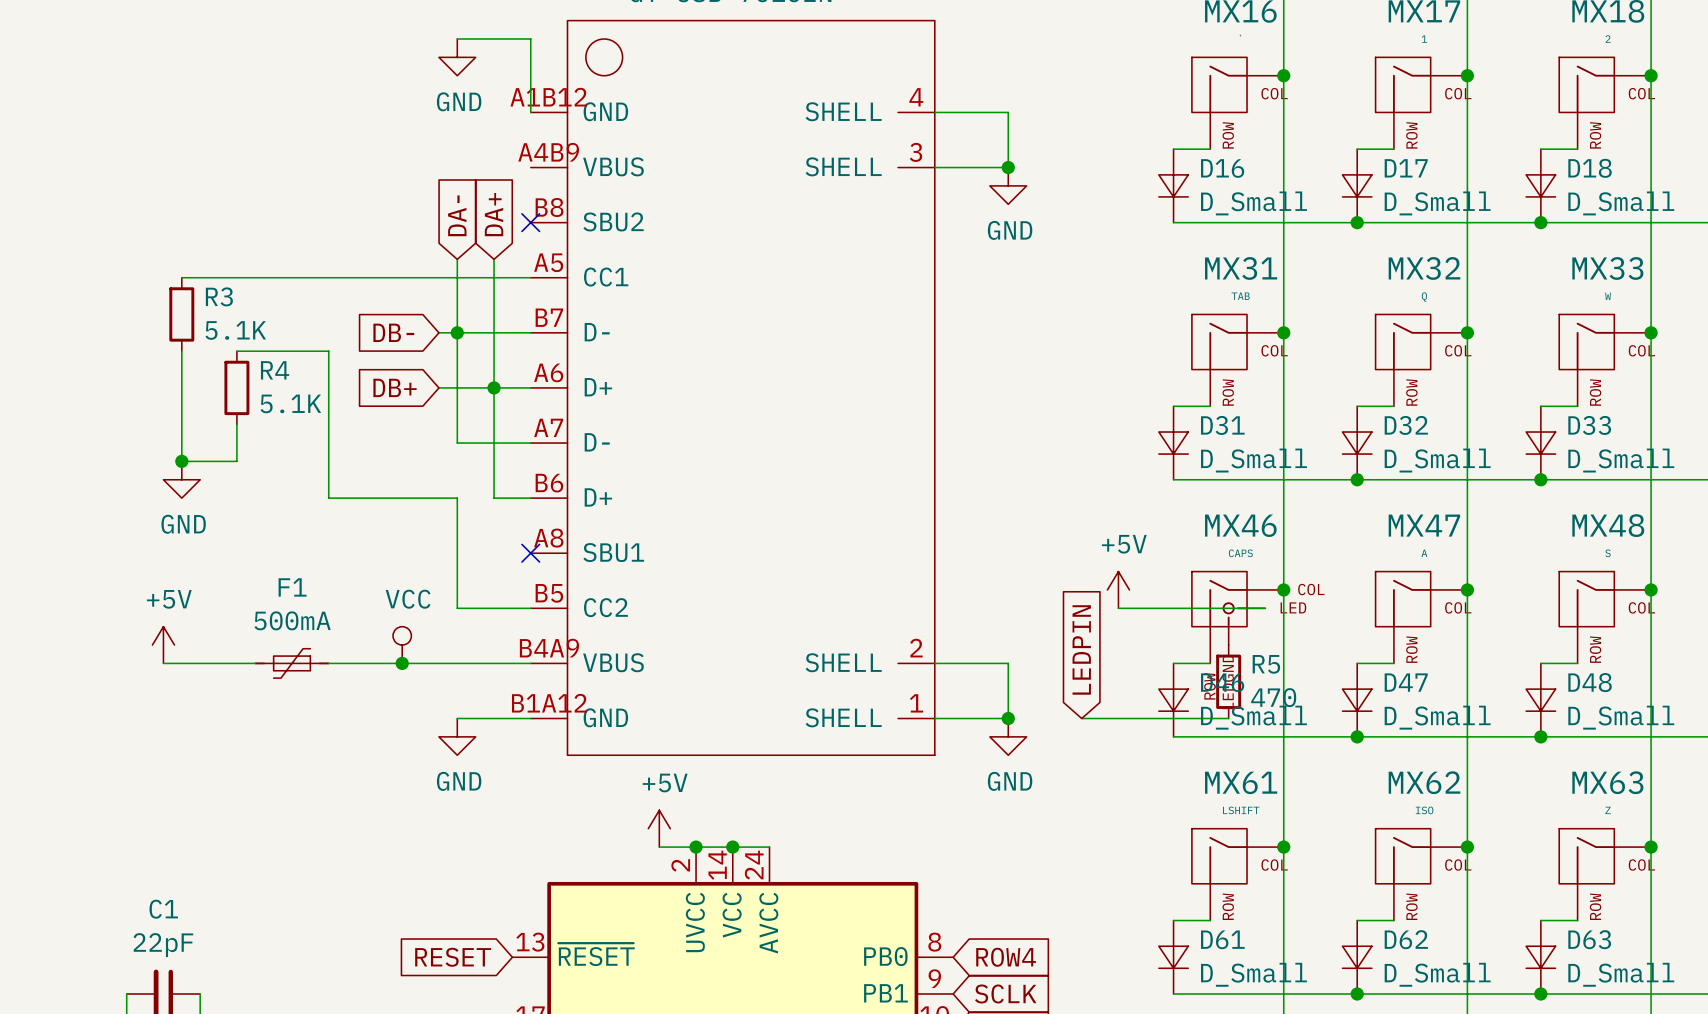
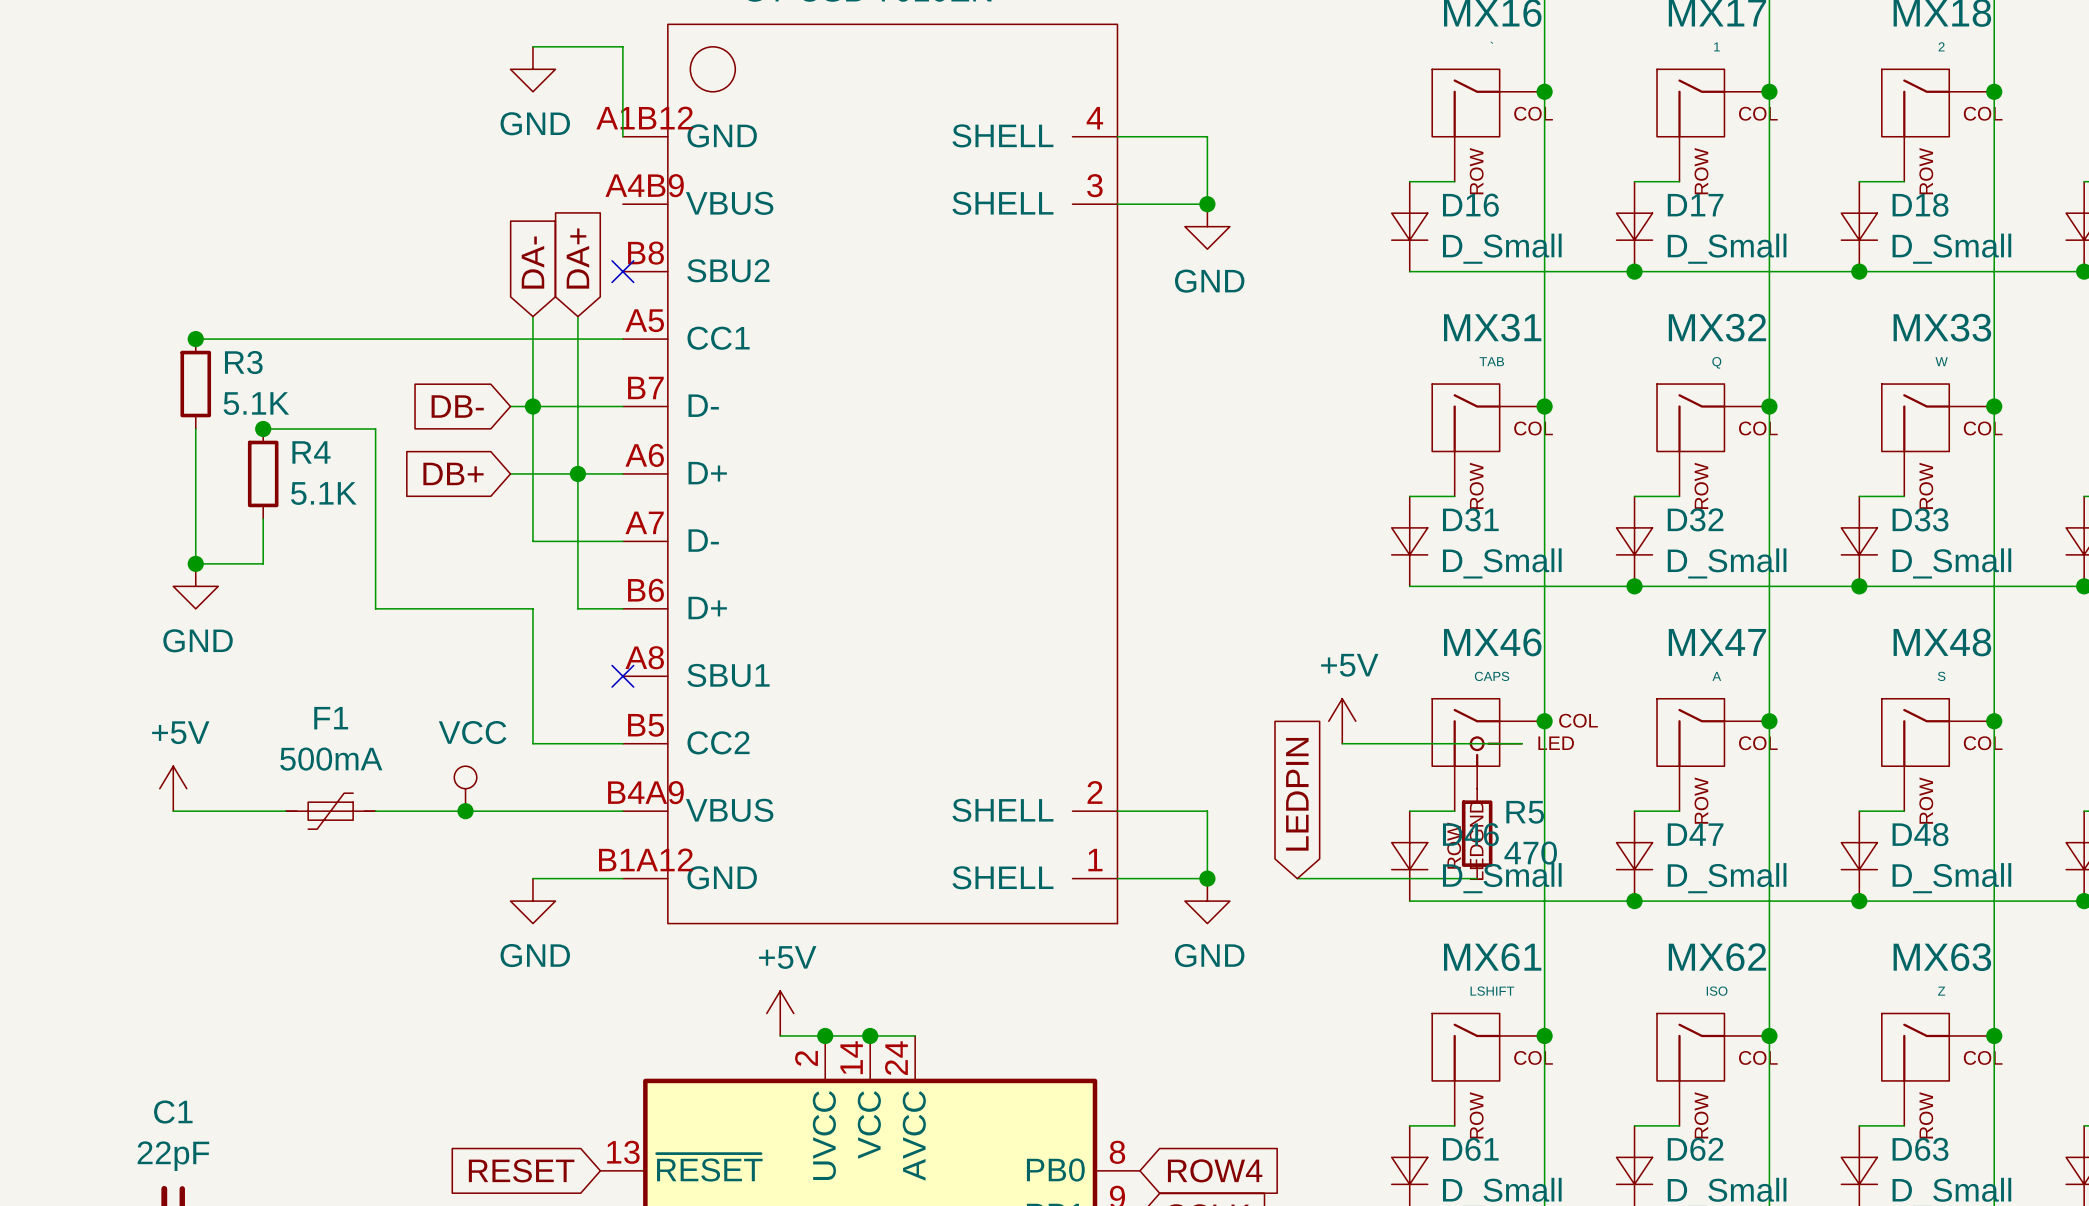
junction: none -> (195, 339)
junction: none -> (263, 428)

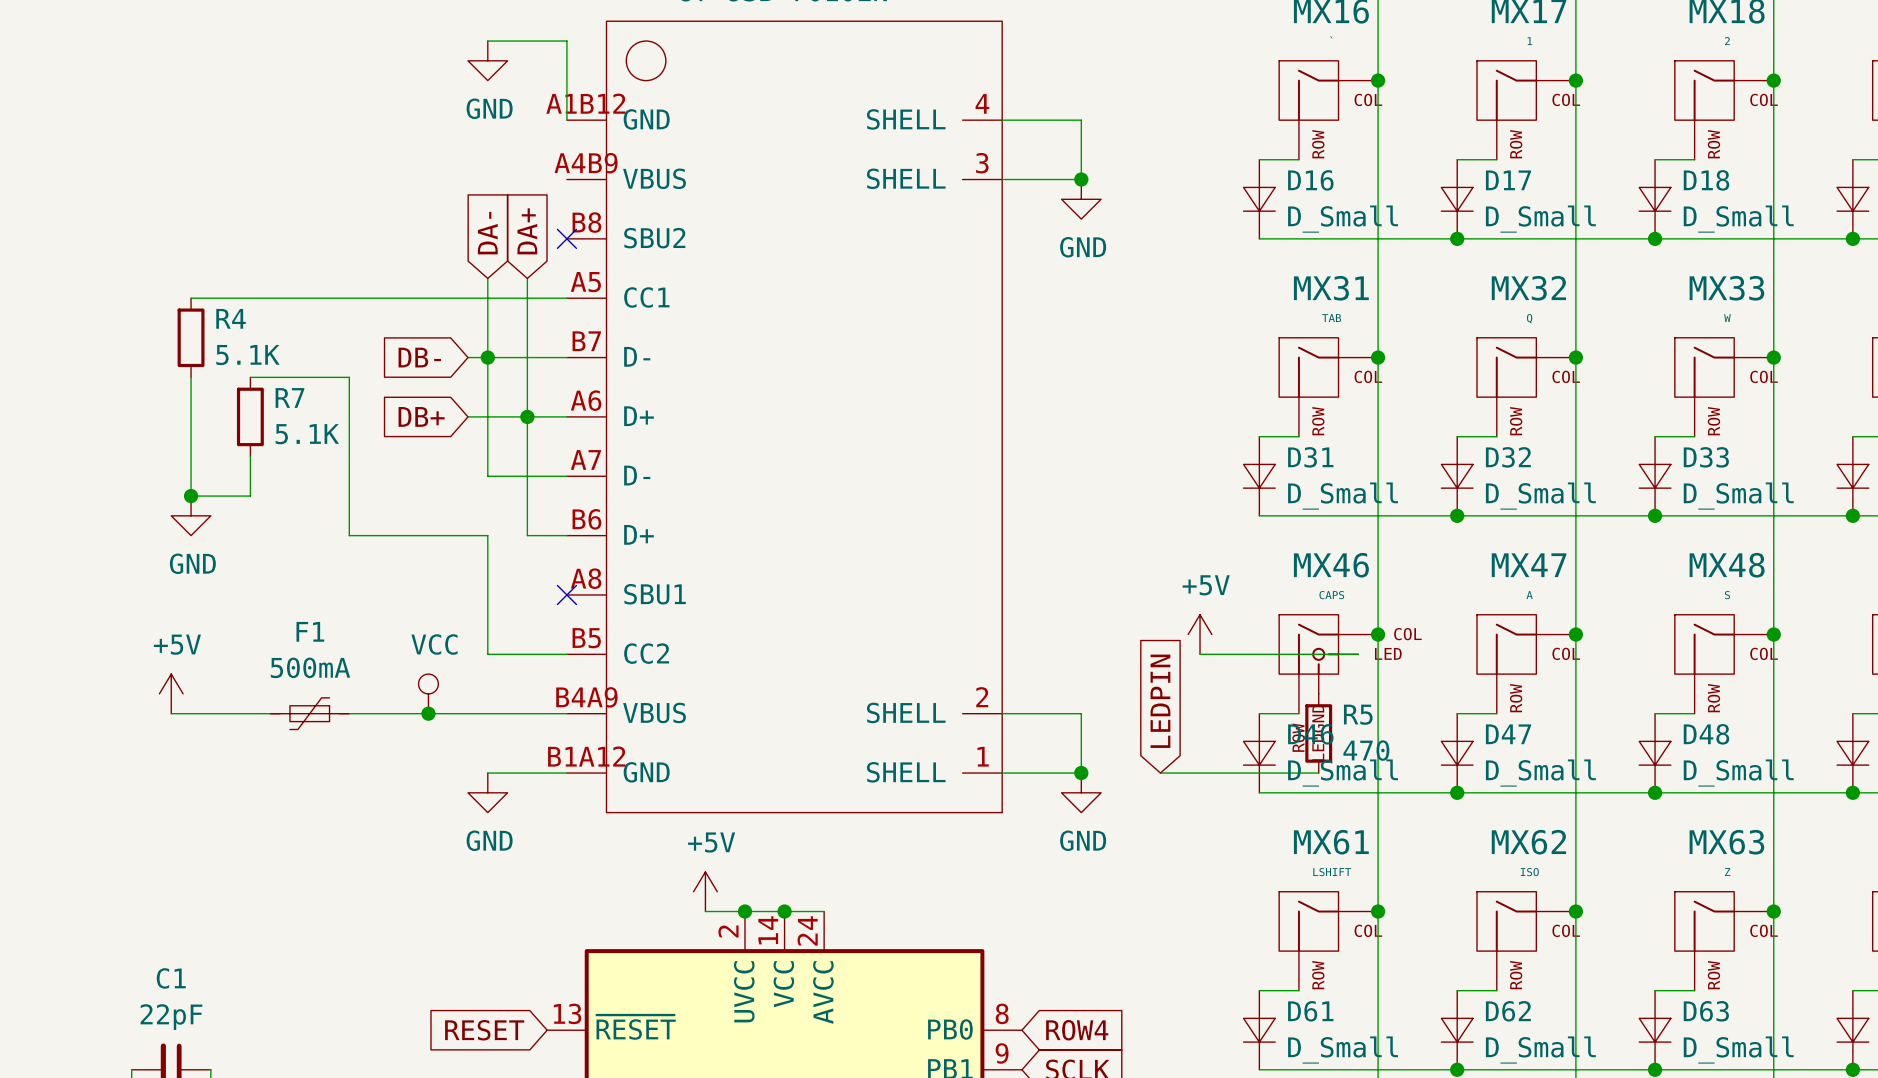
junction: (195, 339) -> none
R3 name: R3 (243, 362) -> R4 (231, 318)
junction: (263, 428) -> none
R4 name: R4 (311, 452) -> R7 (290, 397)

